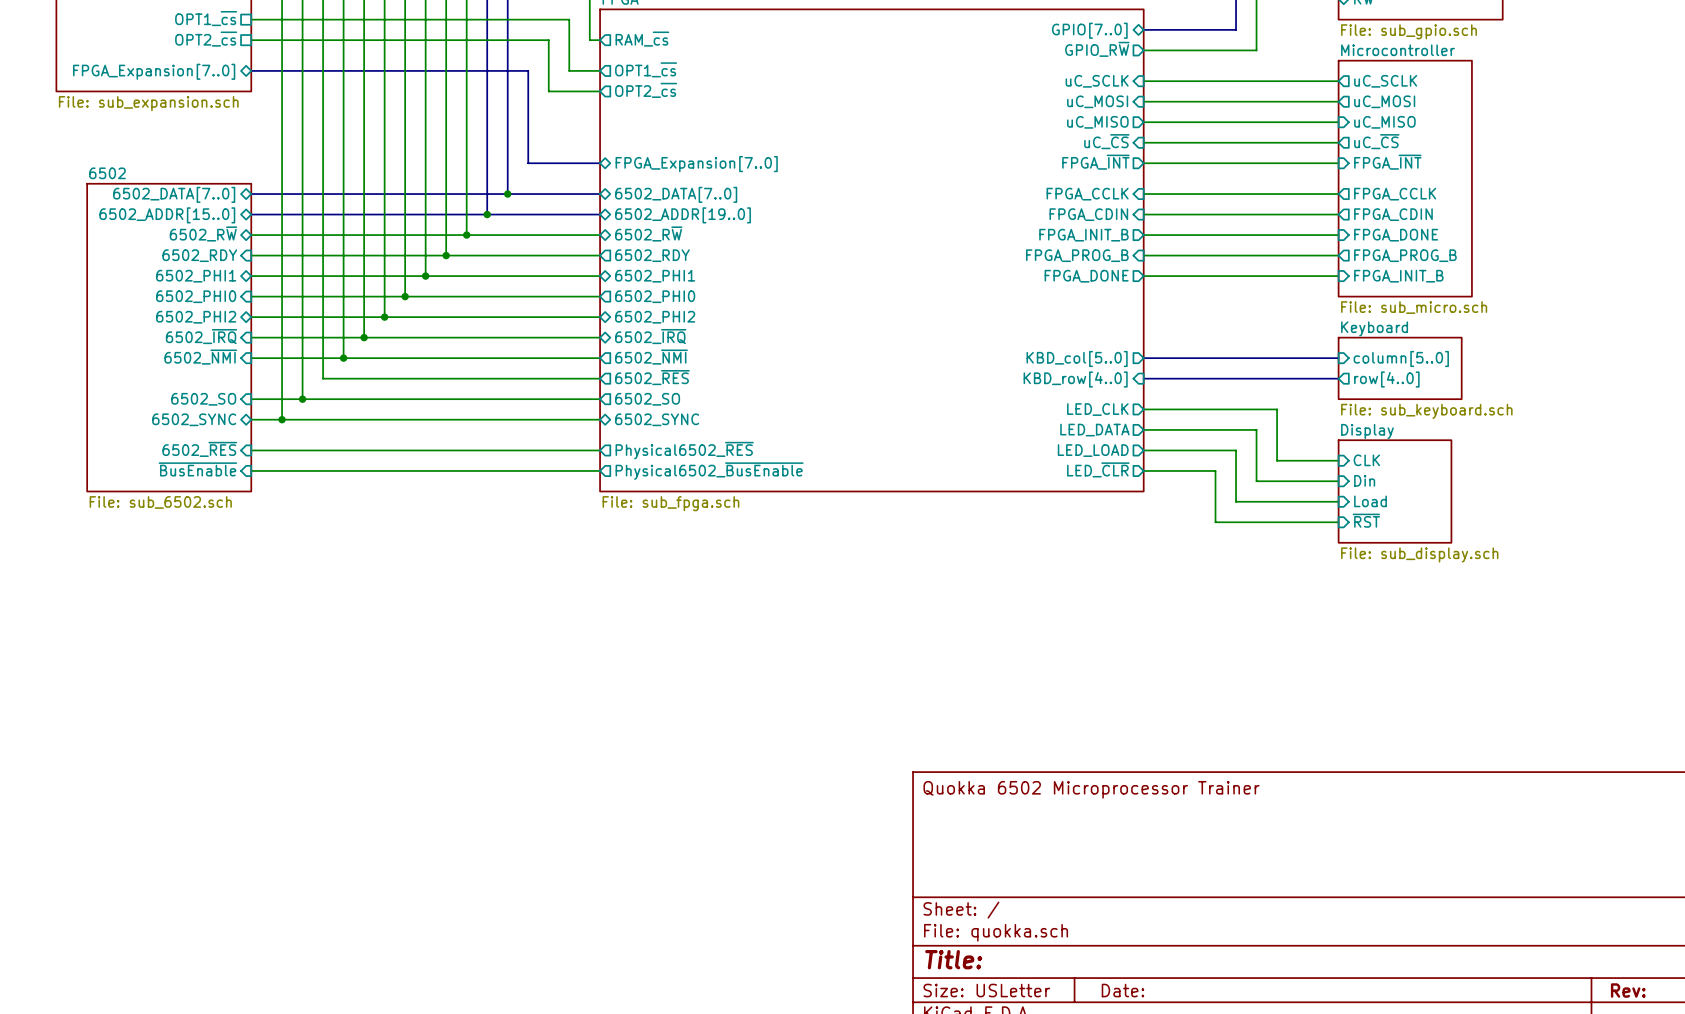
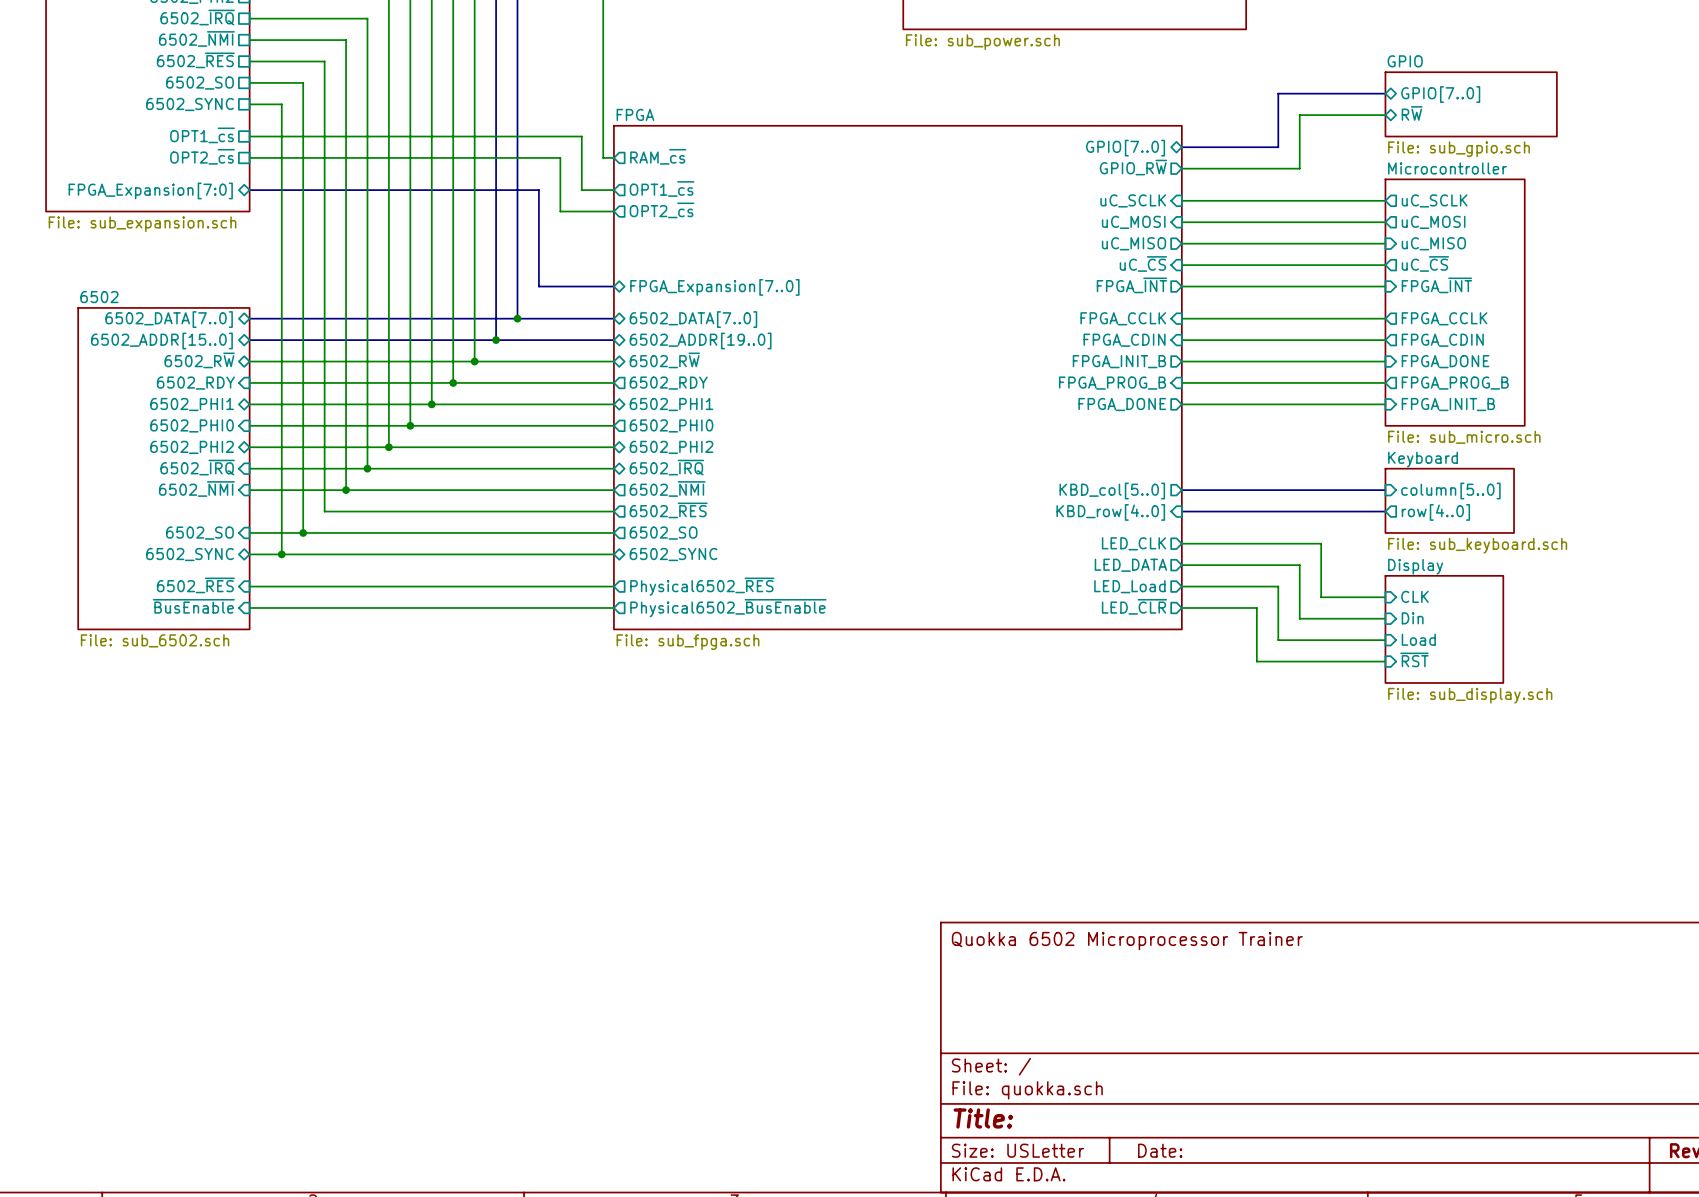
sheet pin: FPGA_Expansion[7..0] (154, 71) -> FPGA_Expansion[7:0] (150, 190)
sheet pin: LED_LOAD (1093, 450) -> LED_Load (1129, 586)

